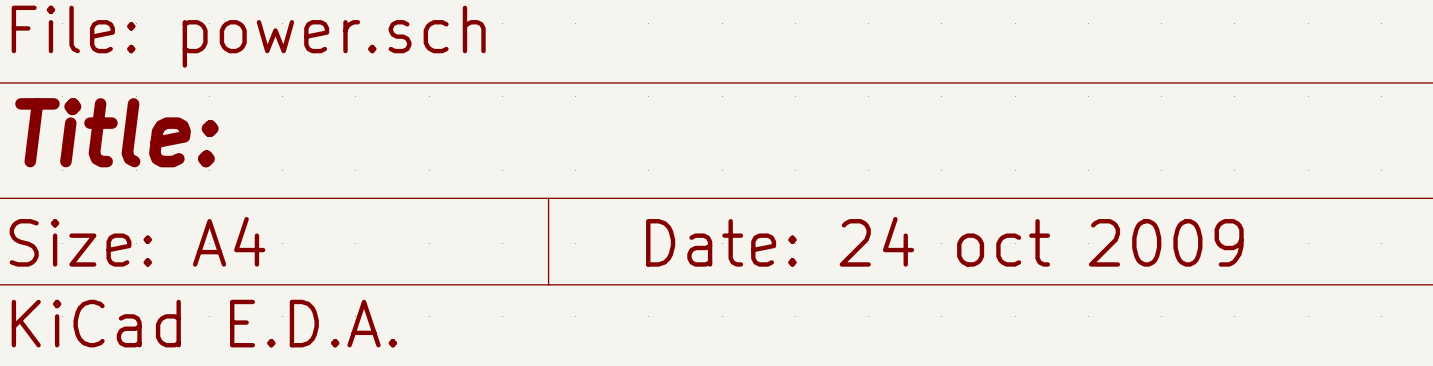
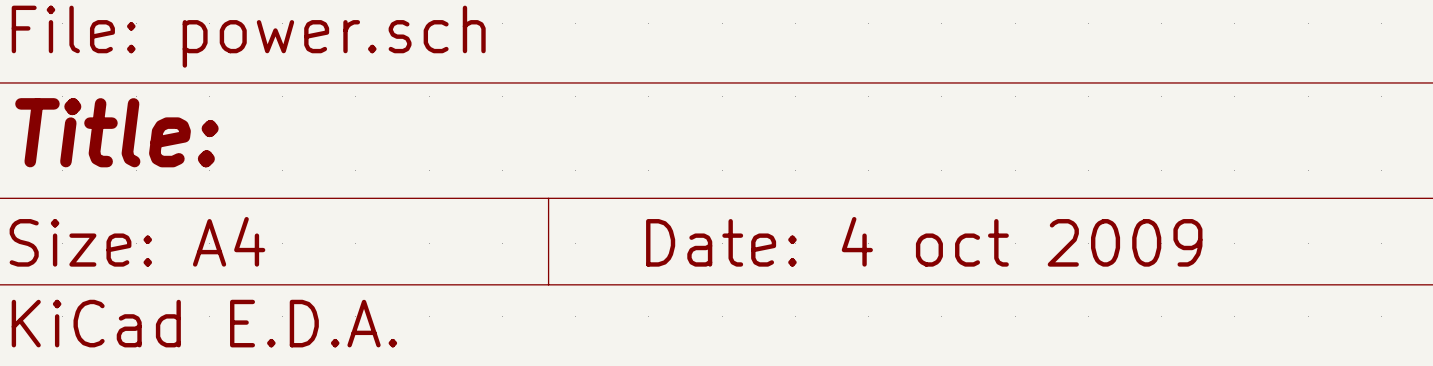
title block: Date: 24 oct 2009 (944, 241) -> Date: 4 oct 2009 (924, 241)

